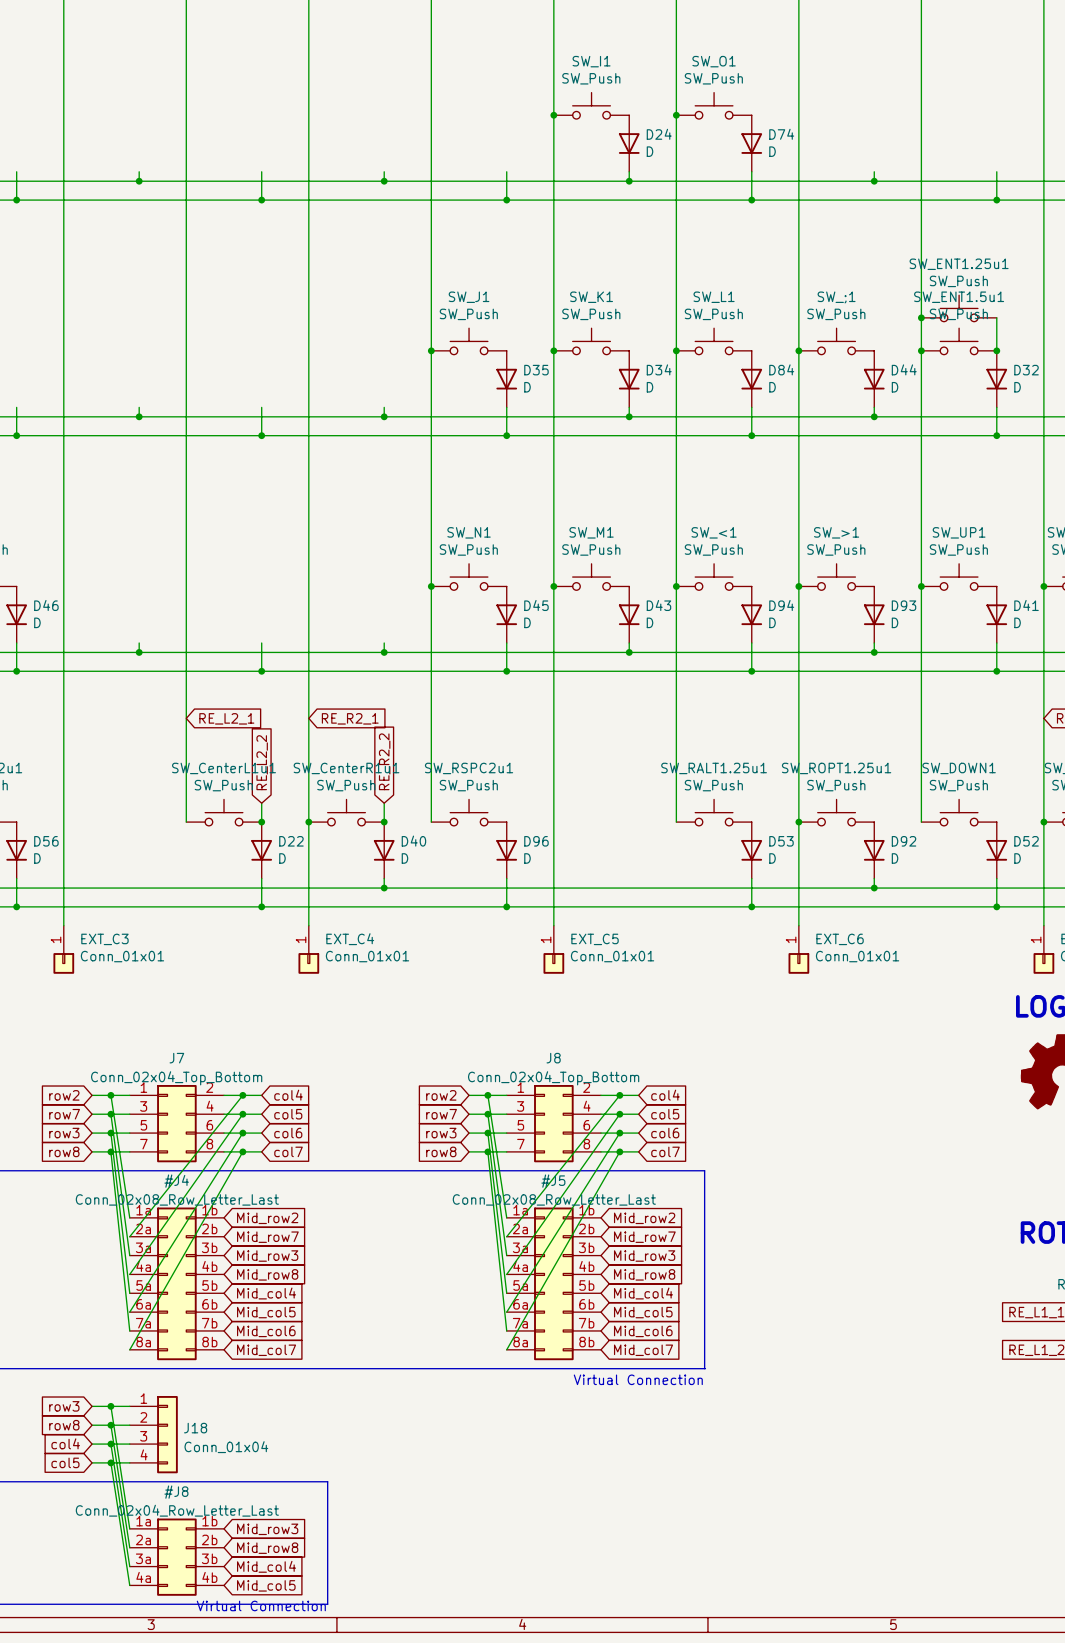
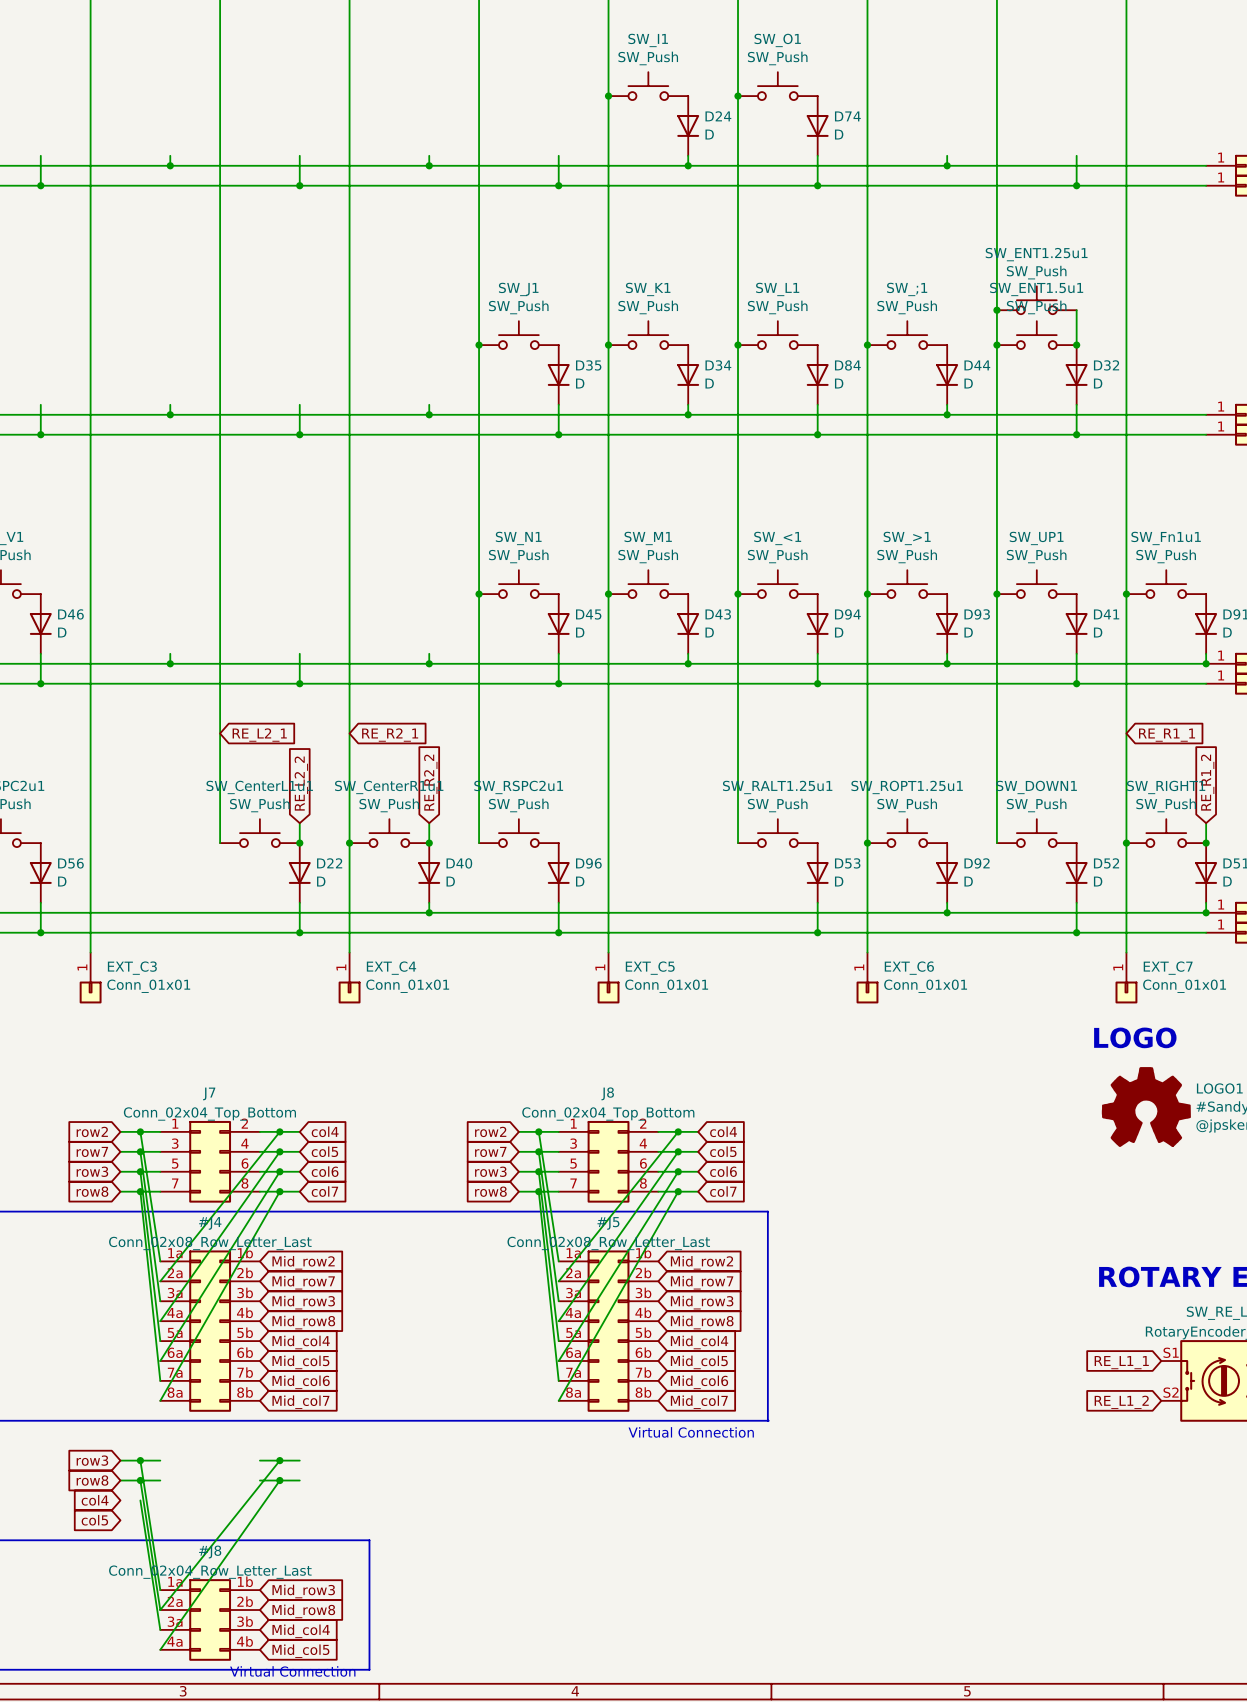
wire: none -> (279, 1460) (160, 1610)
junction: none -> (279, 1460)
junction: none -> (279, 1480)
J18: Conn_01x04 (153, 1434) -> none
wire: (92, 1444) (129, 1444) -> (259, 1460) (299, 1460)
junction: (110, 1444) -> none
wire: (92, 1462) (129, 1462) -> (259, 1480) (299, 1480)
wire: (110, 1462) (129, 1585) -> (279, 1480) (160, 1649)
junction: (110, 1462) -> none

